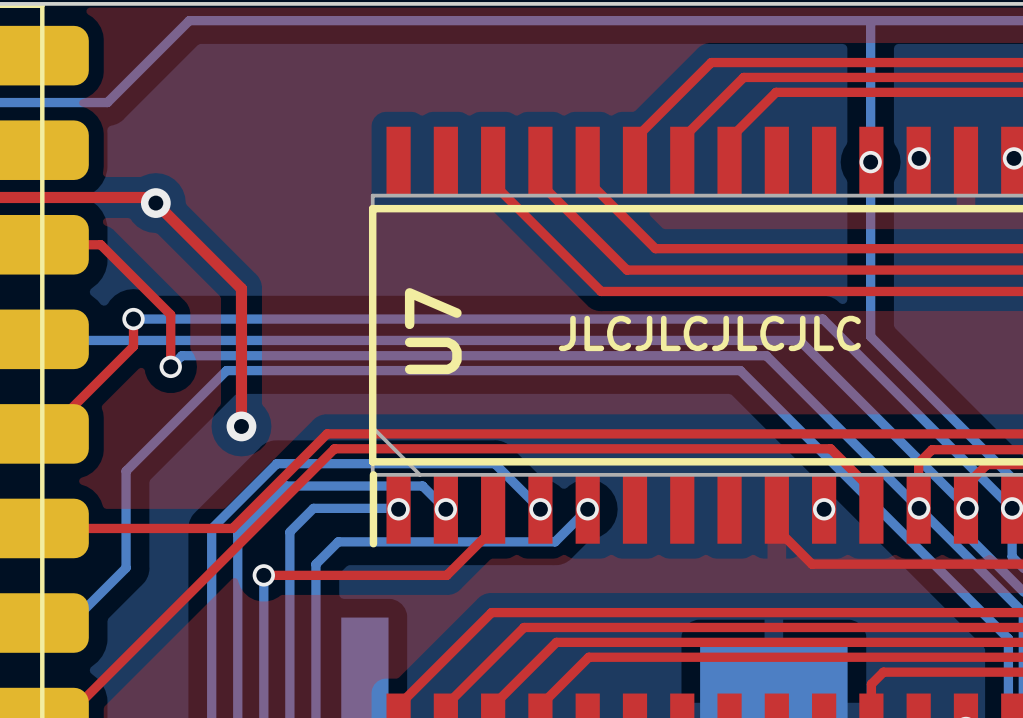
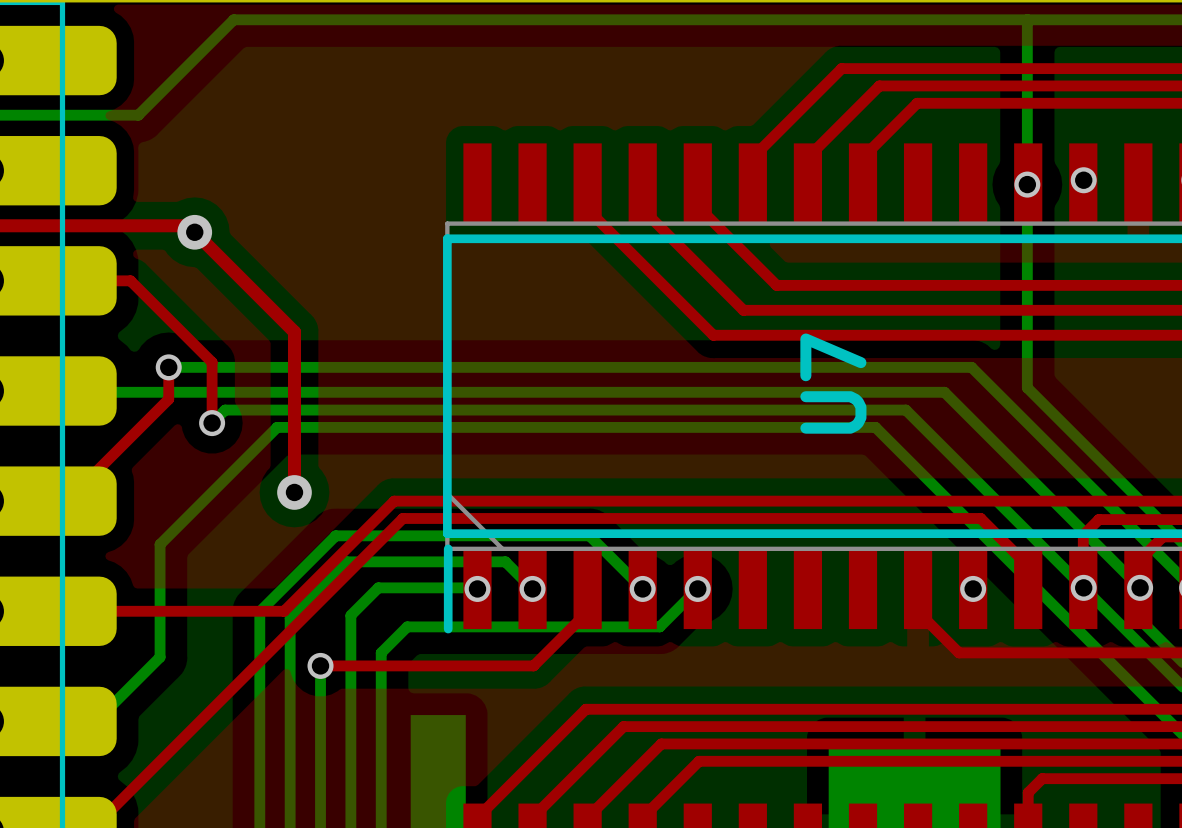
U7 name position: U7 (433, 331) -> U7 (833, 383)
text: JLCJLCJLCJLC (709, 333) -> none

